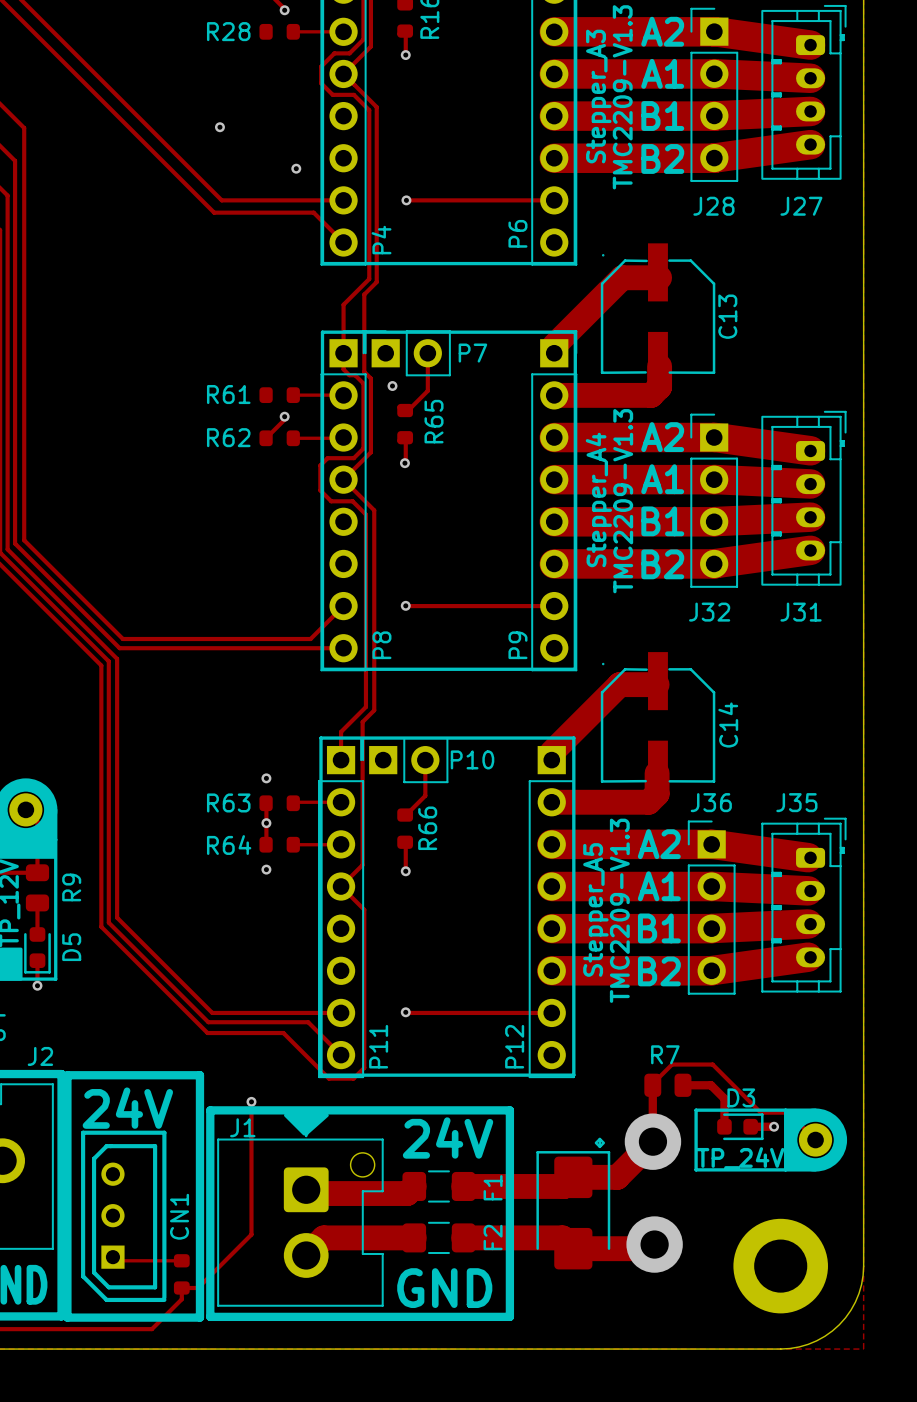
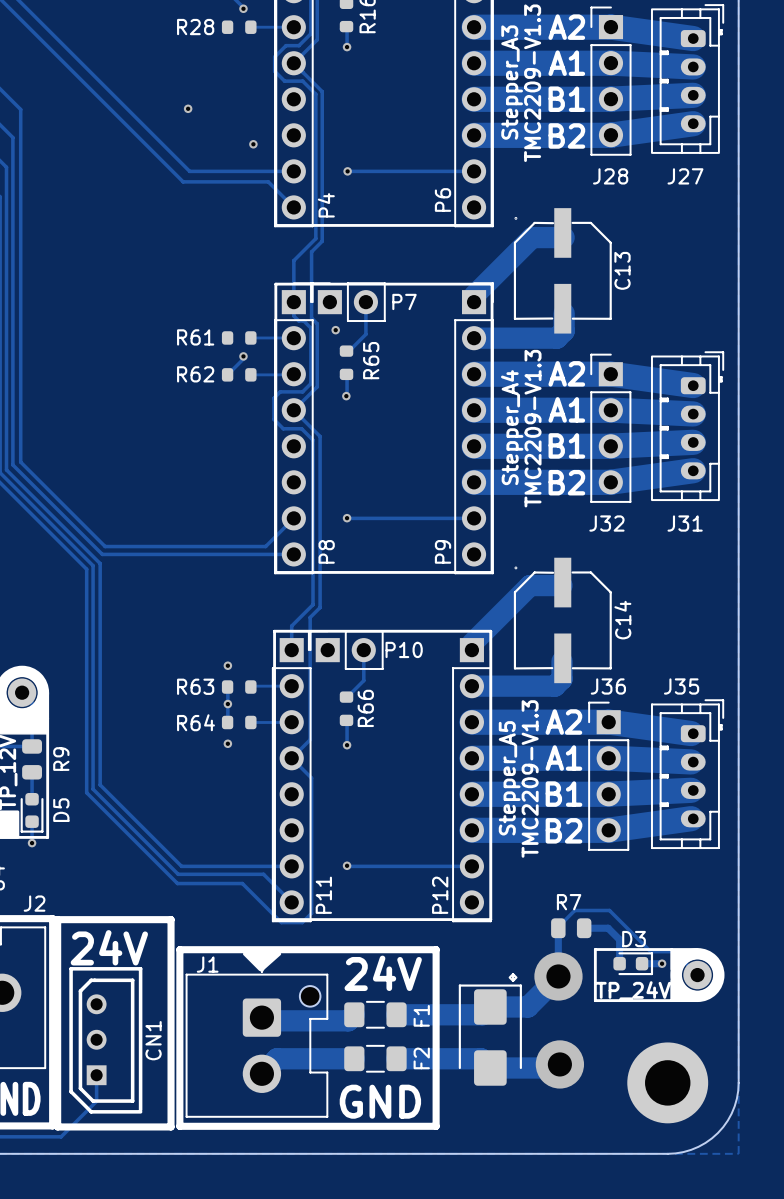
track: (251, 1101) (251, 1234) (198, 1288) (181, 1288) (181, 1299) (151, 1329) (71, 1329) -> none
via: (251, 1101) -> none
track: (112, 1257) (116, 1260) (181, 1260) -> (96, 1075) (96, 1101) (61, 1136)
part: (181, 1274) -> none

